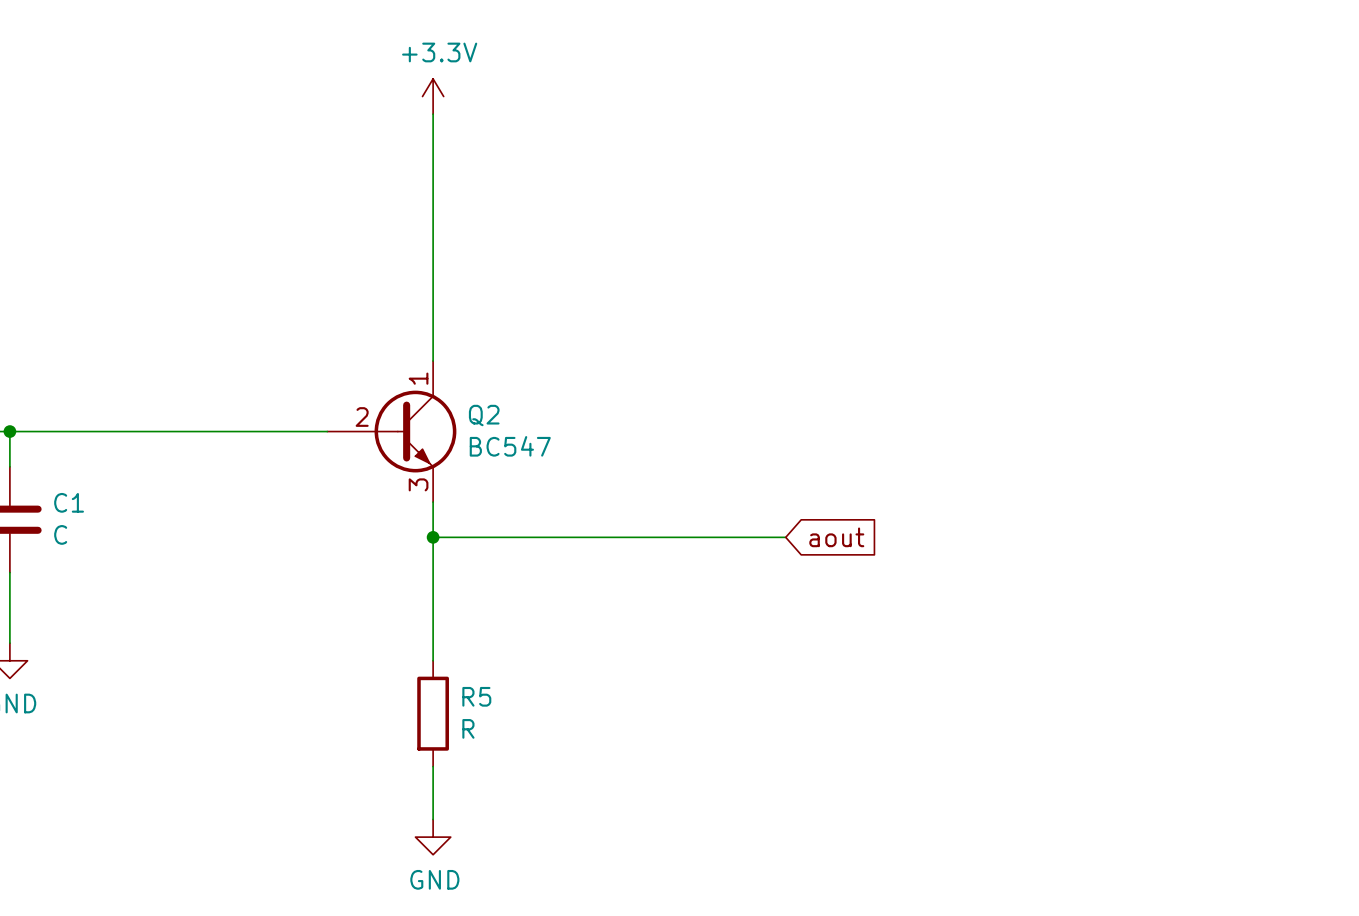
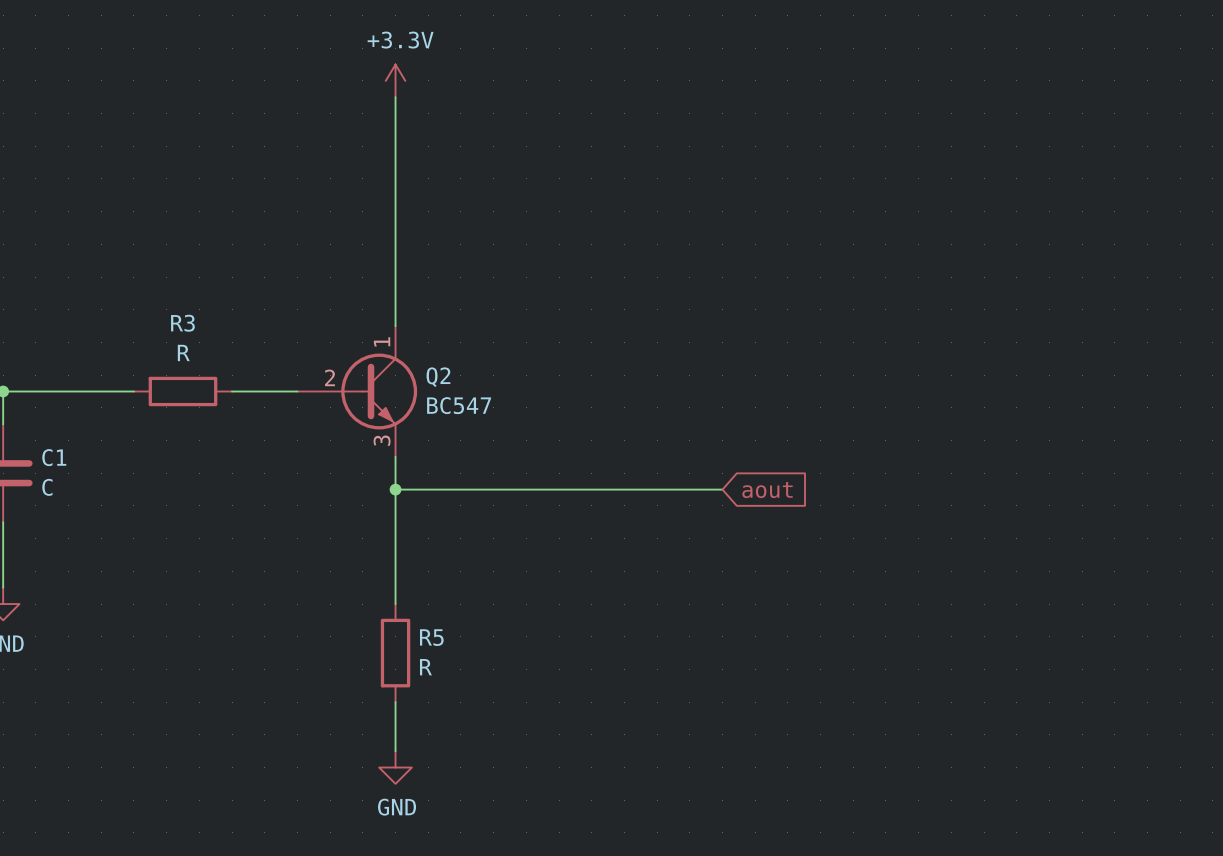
wire: (150, 431) (256, 431) -> none
R3: none -> R (183, 391)

